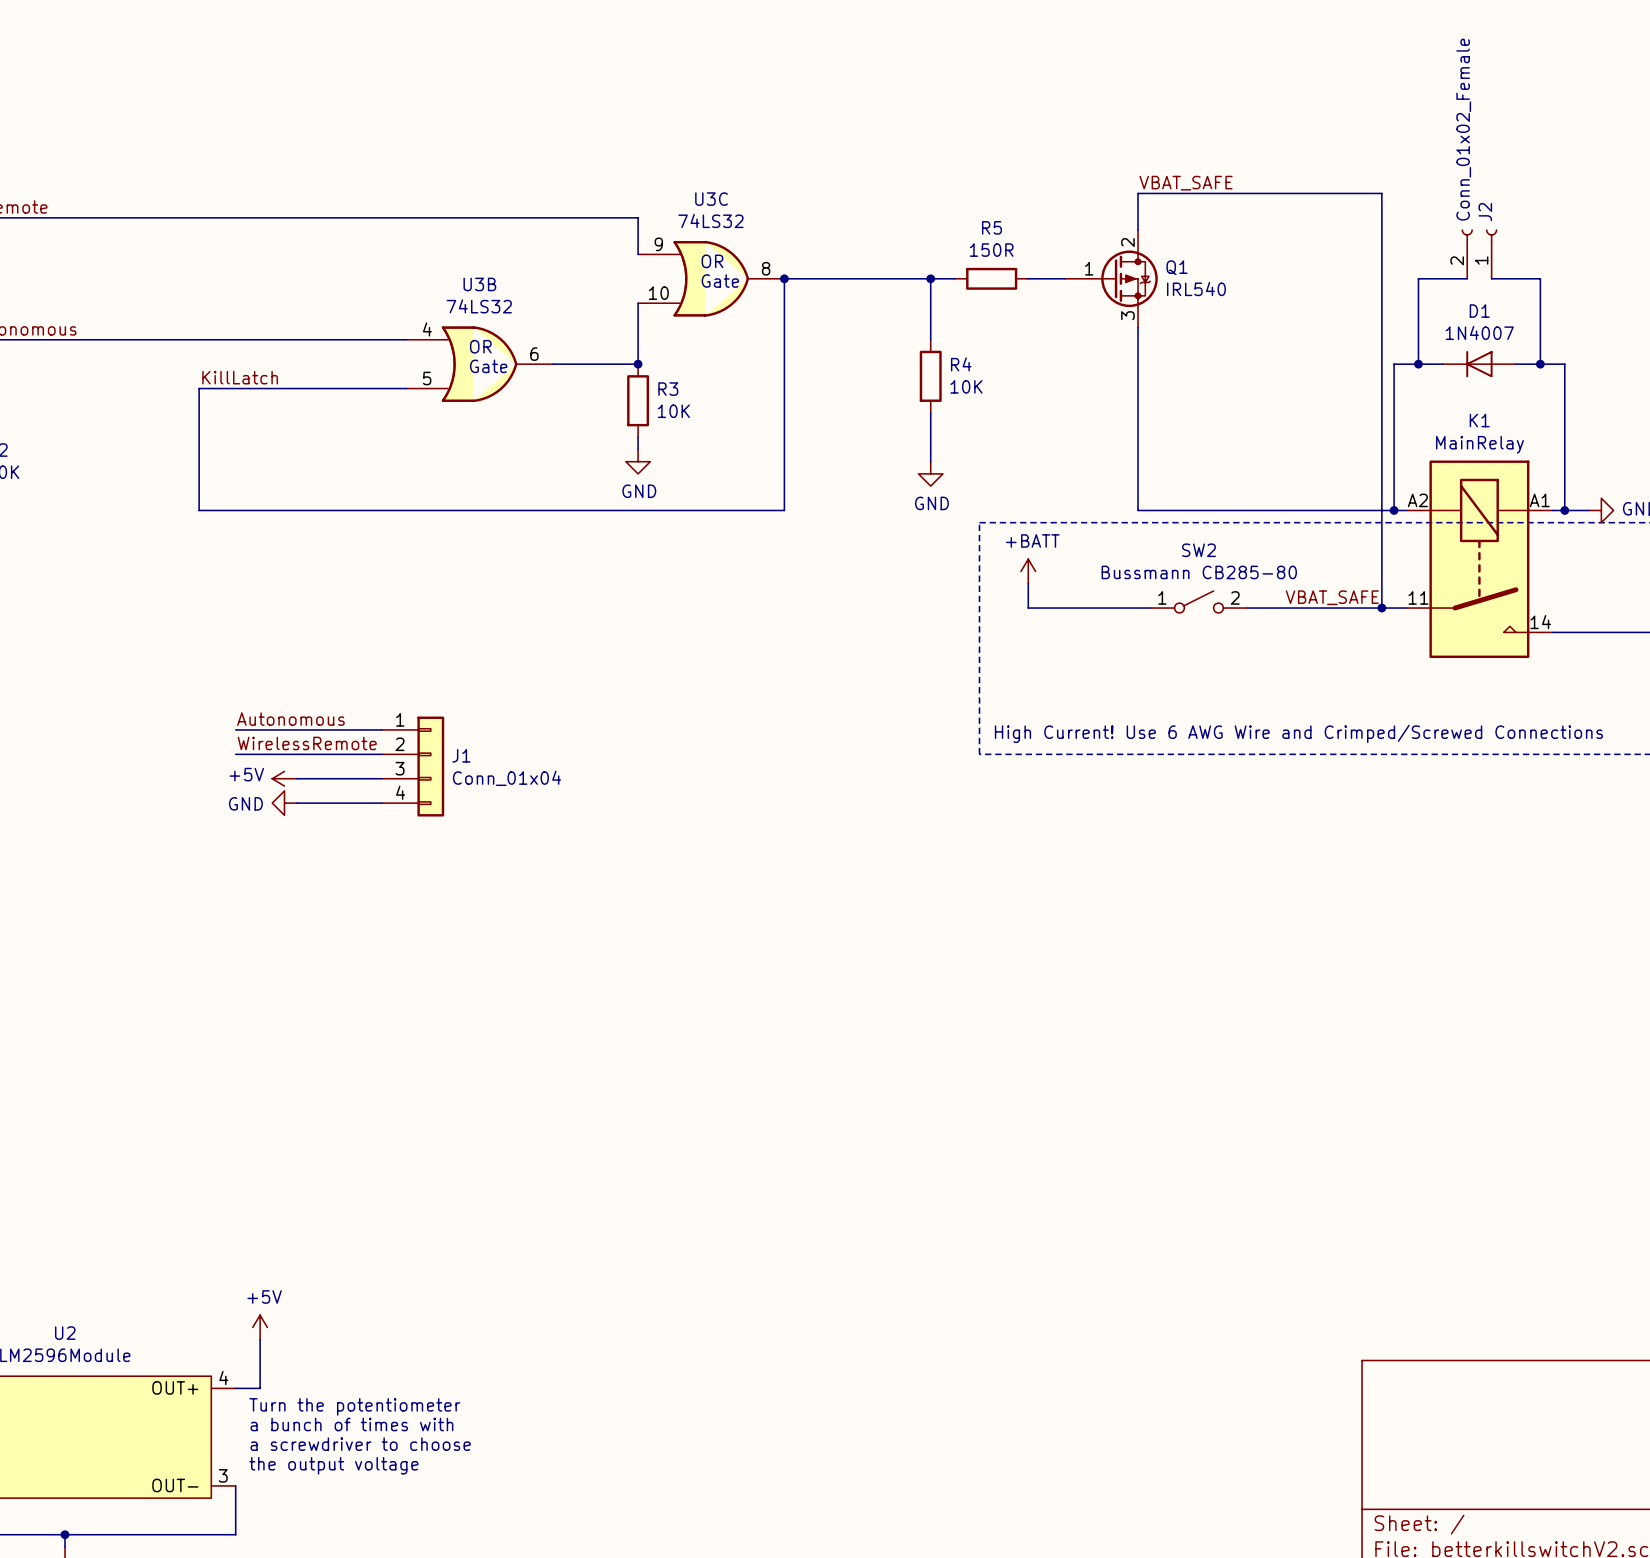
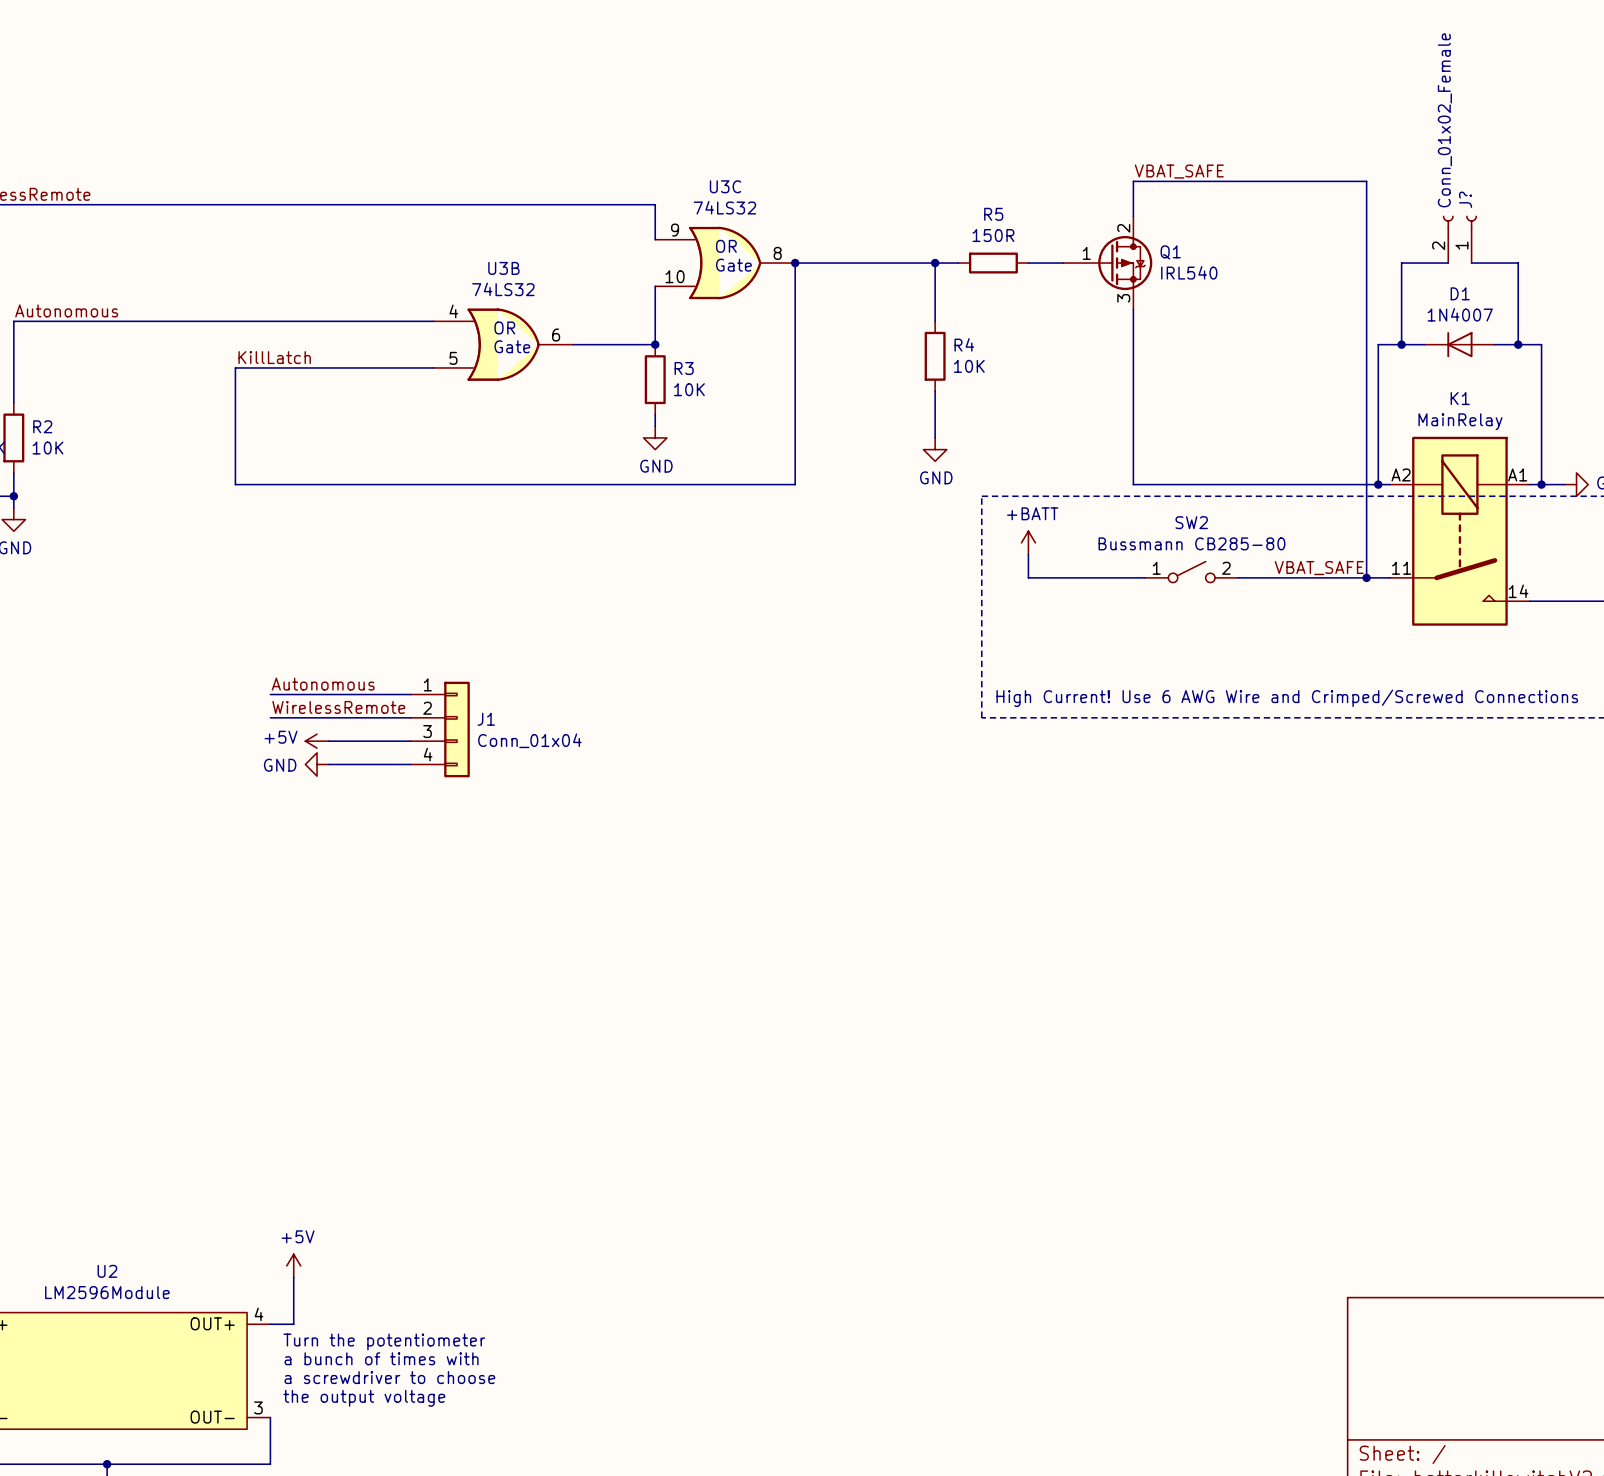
J2 name: J2 (1485, 212) -> J? (1465, 199)

